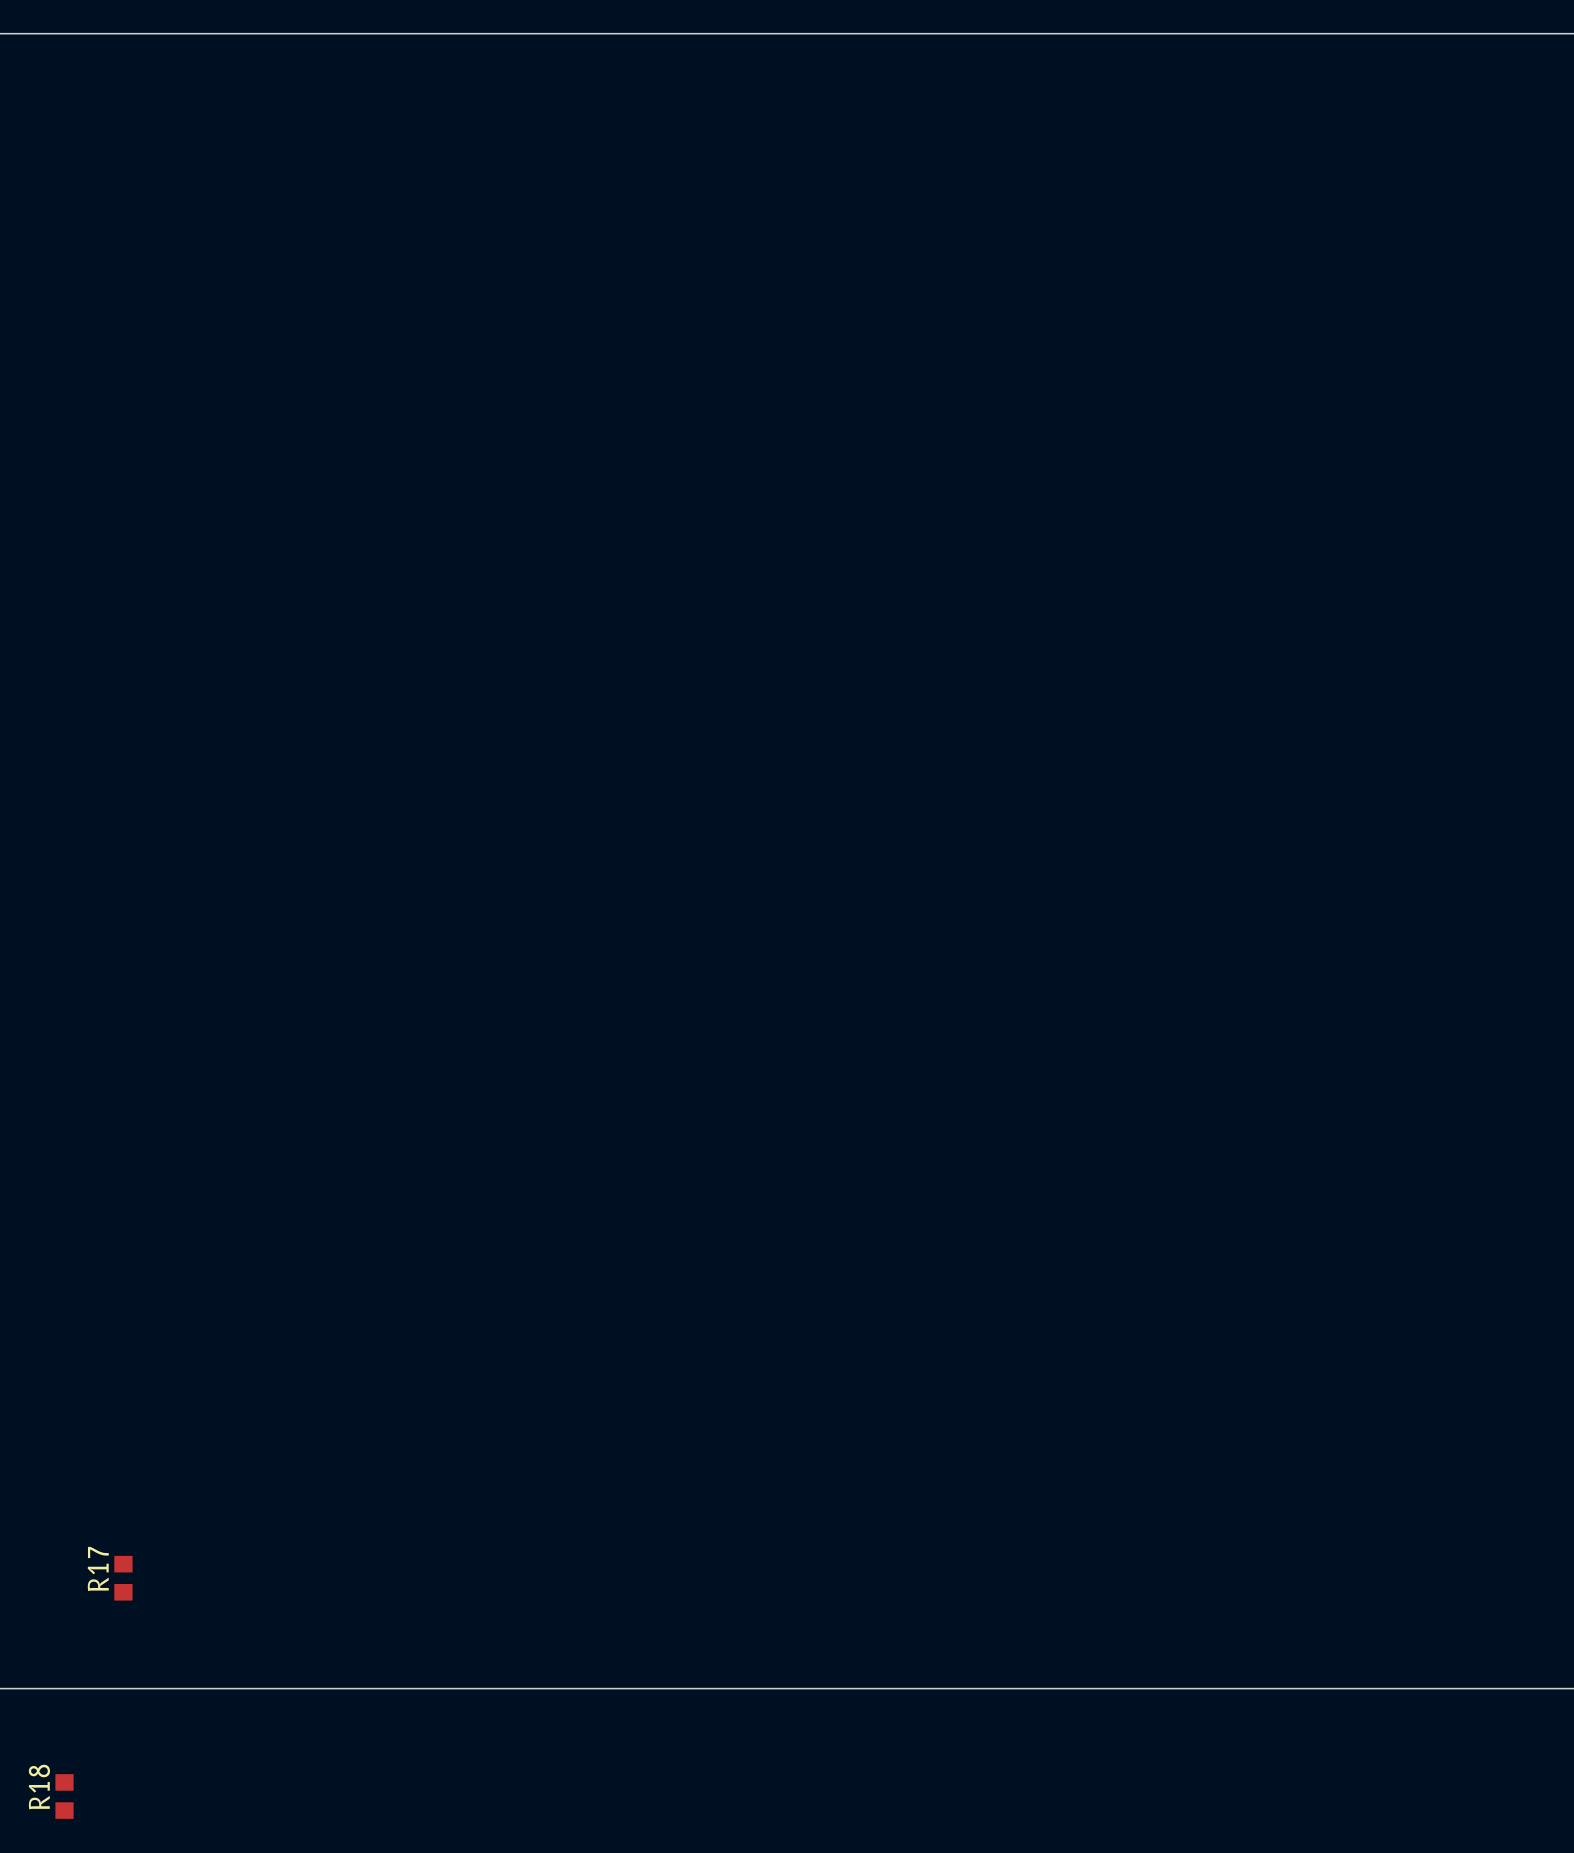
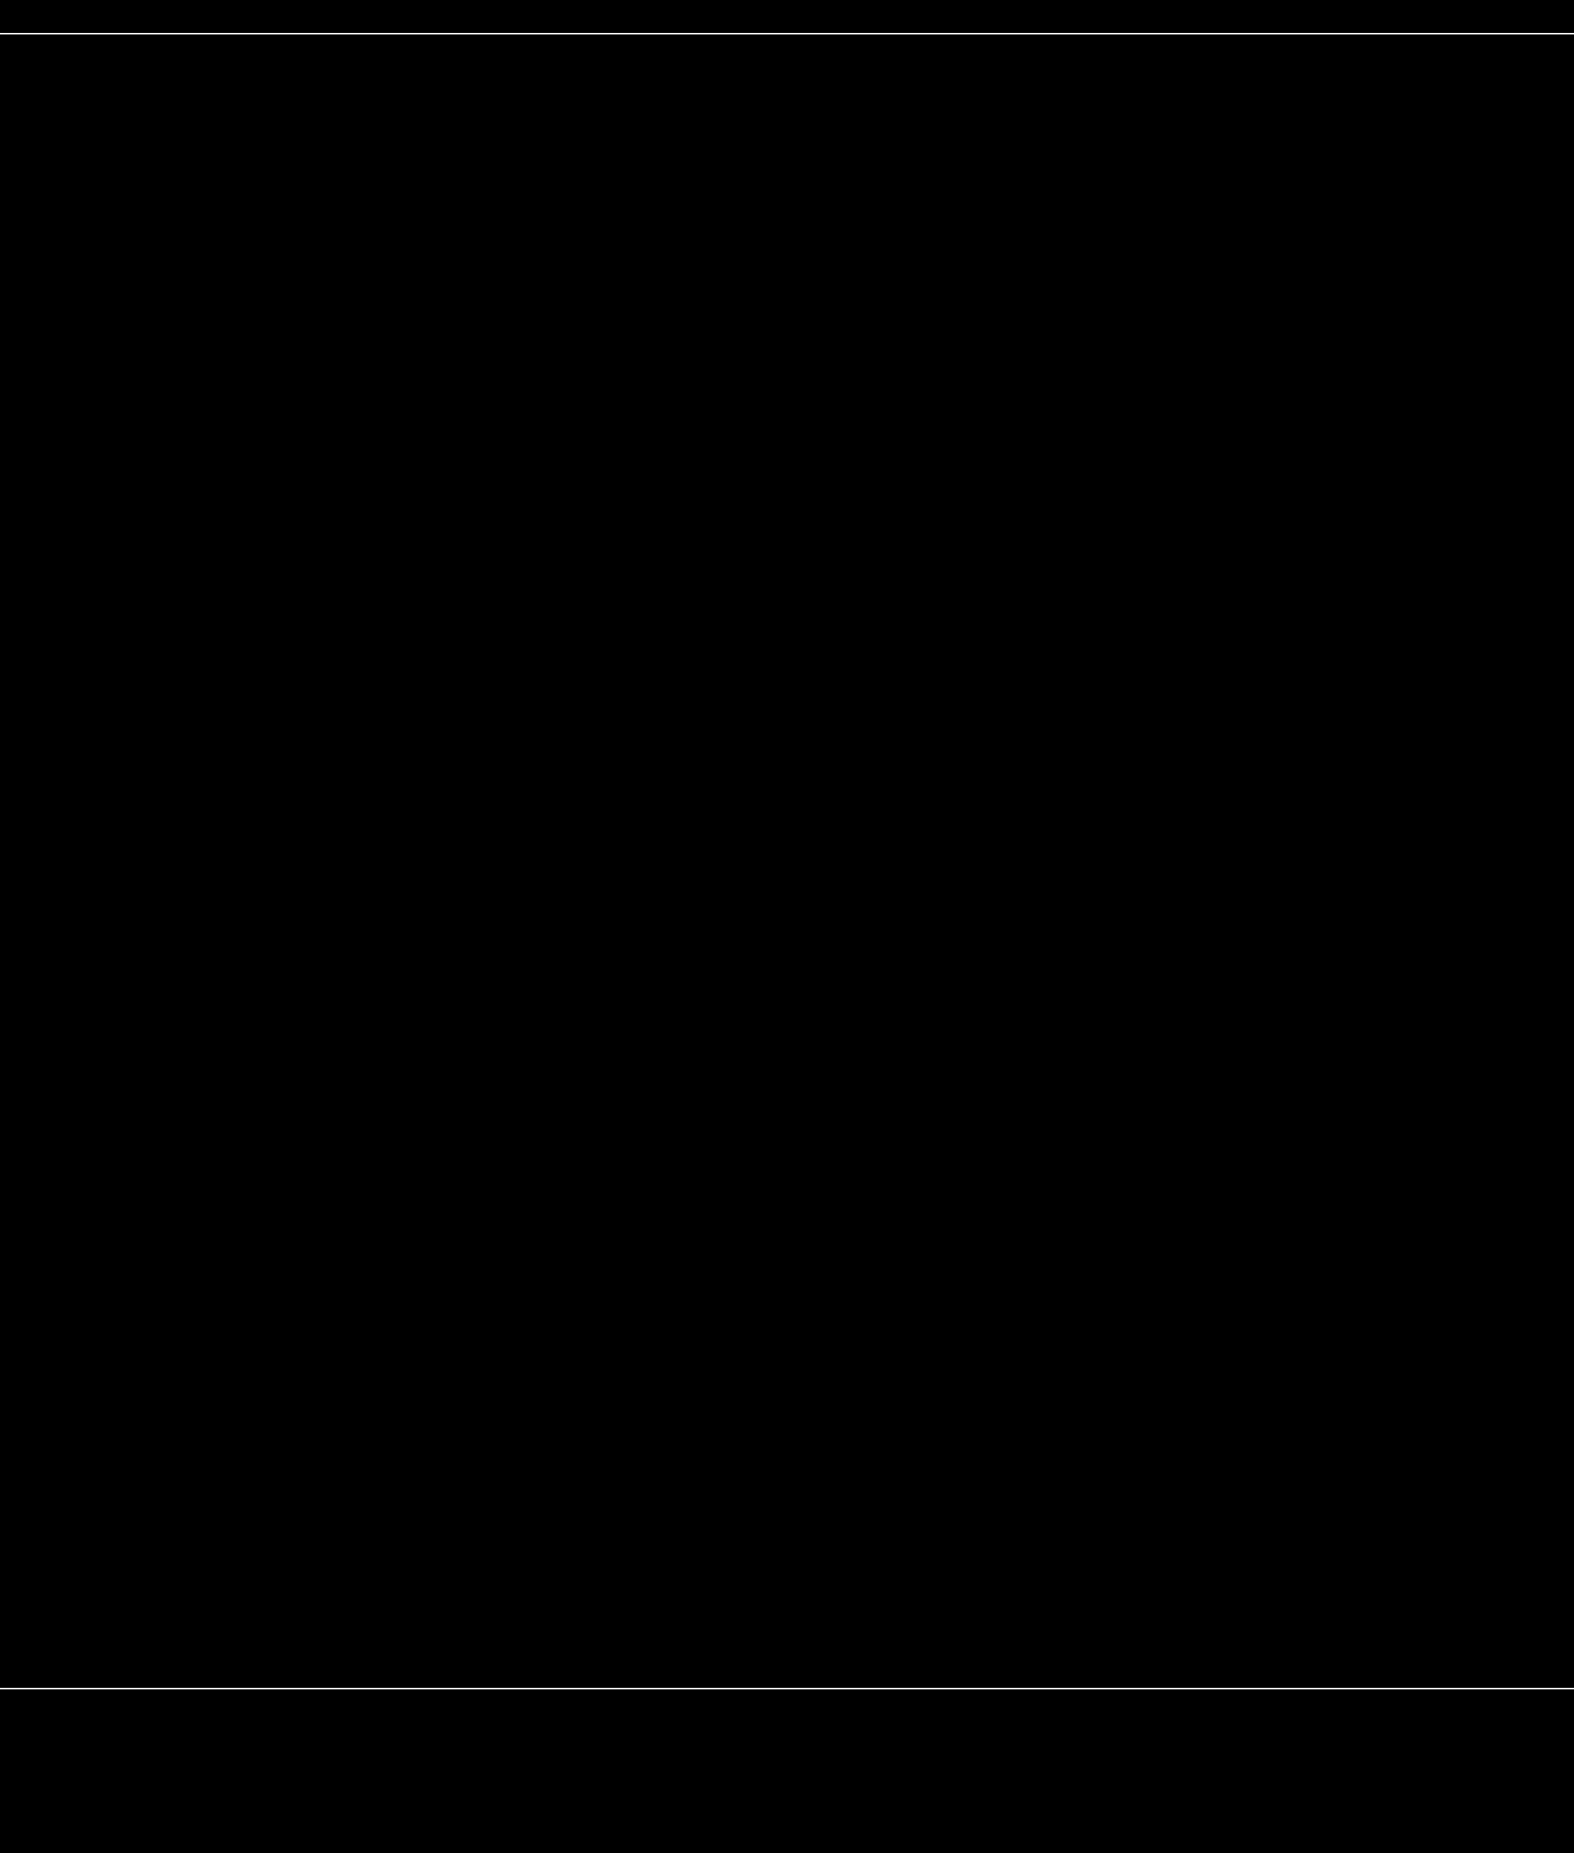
R17: (123, 1578) -> none
R18: (64, 1796) -> none

